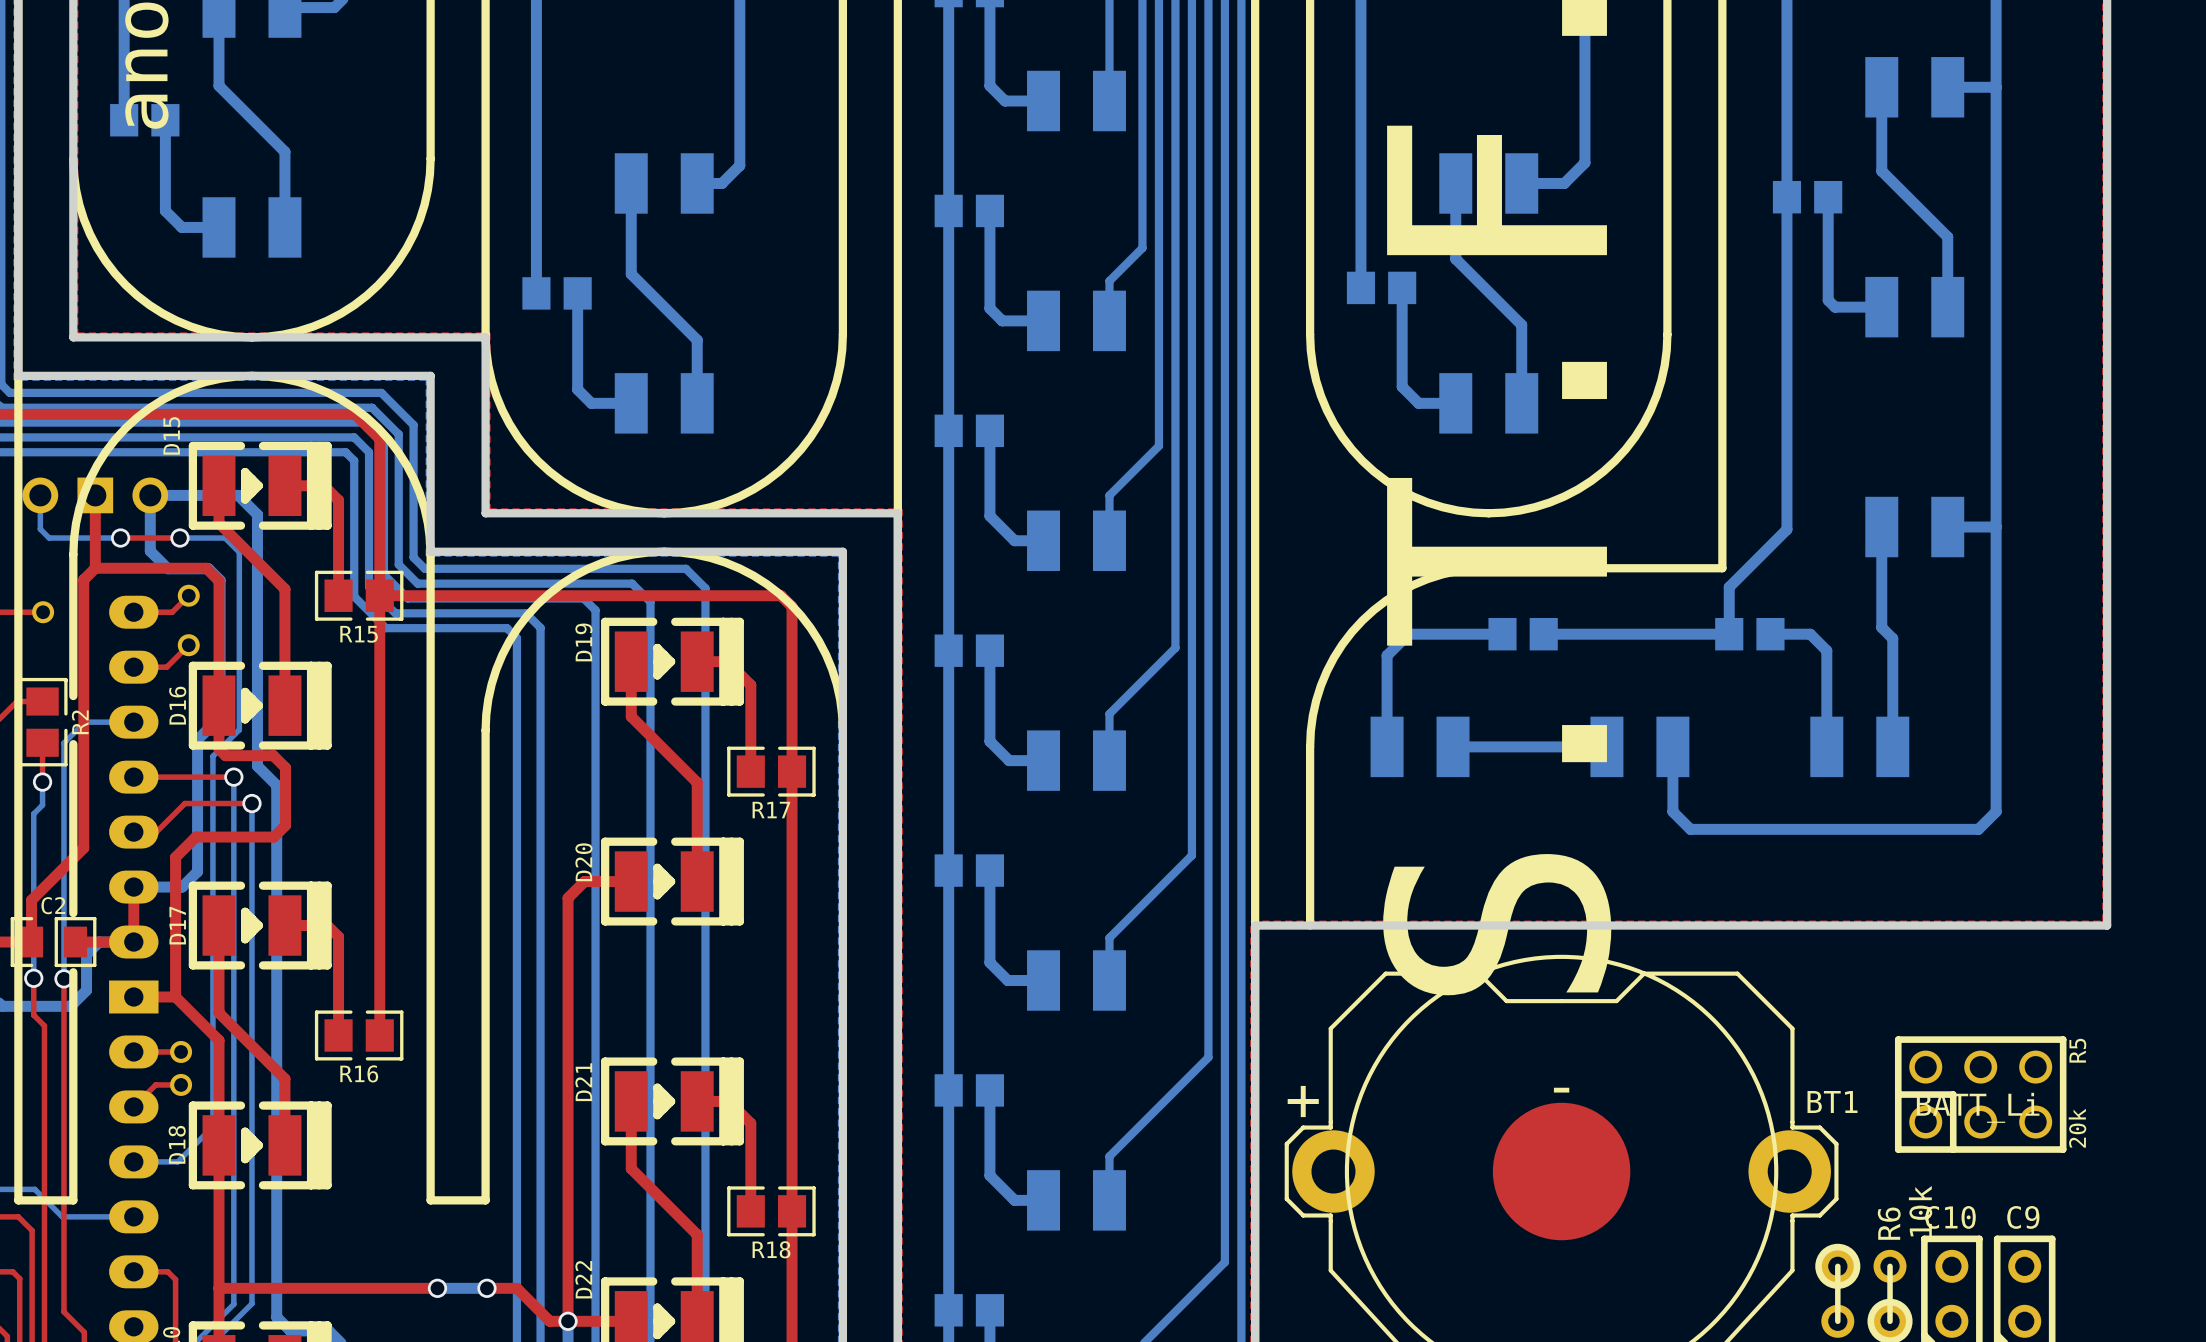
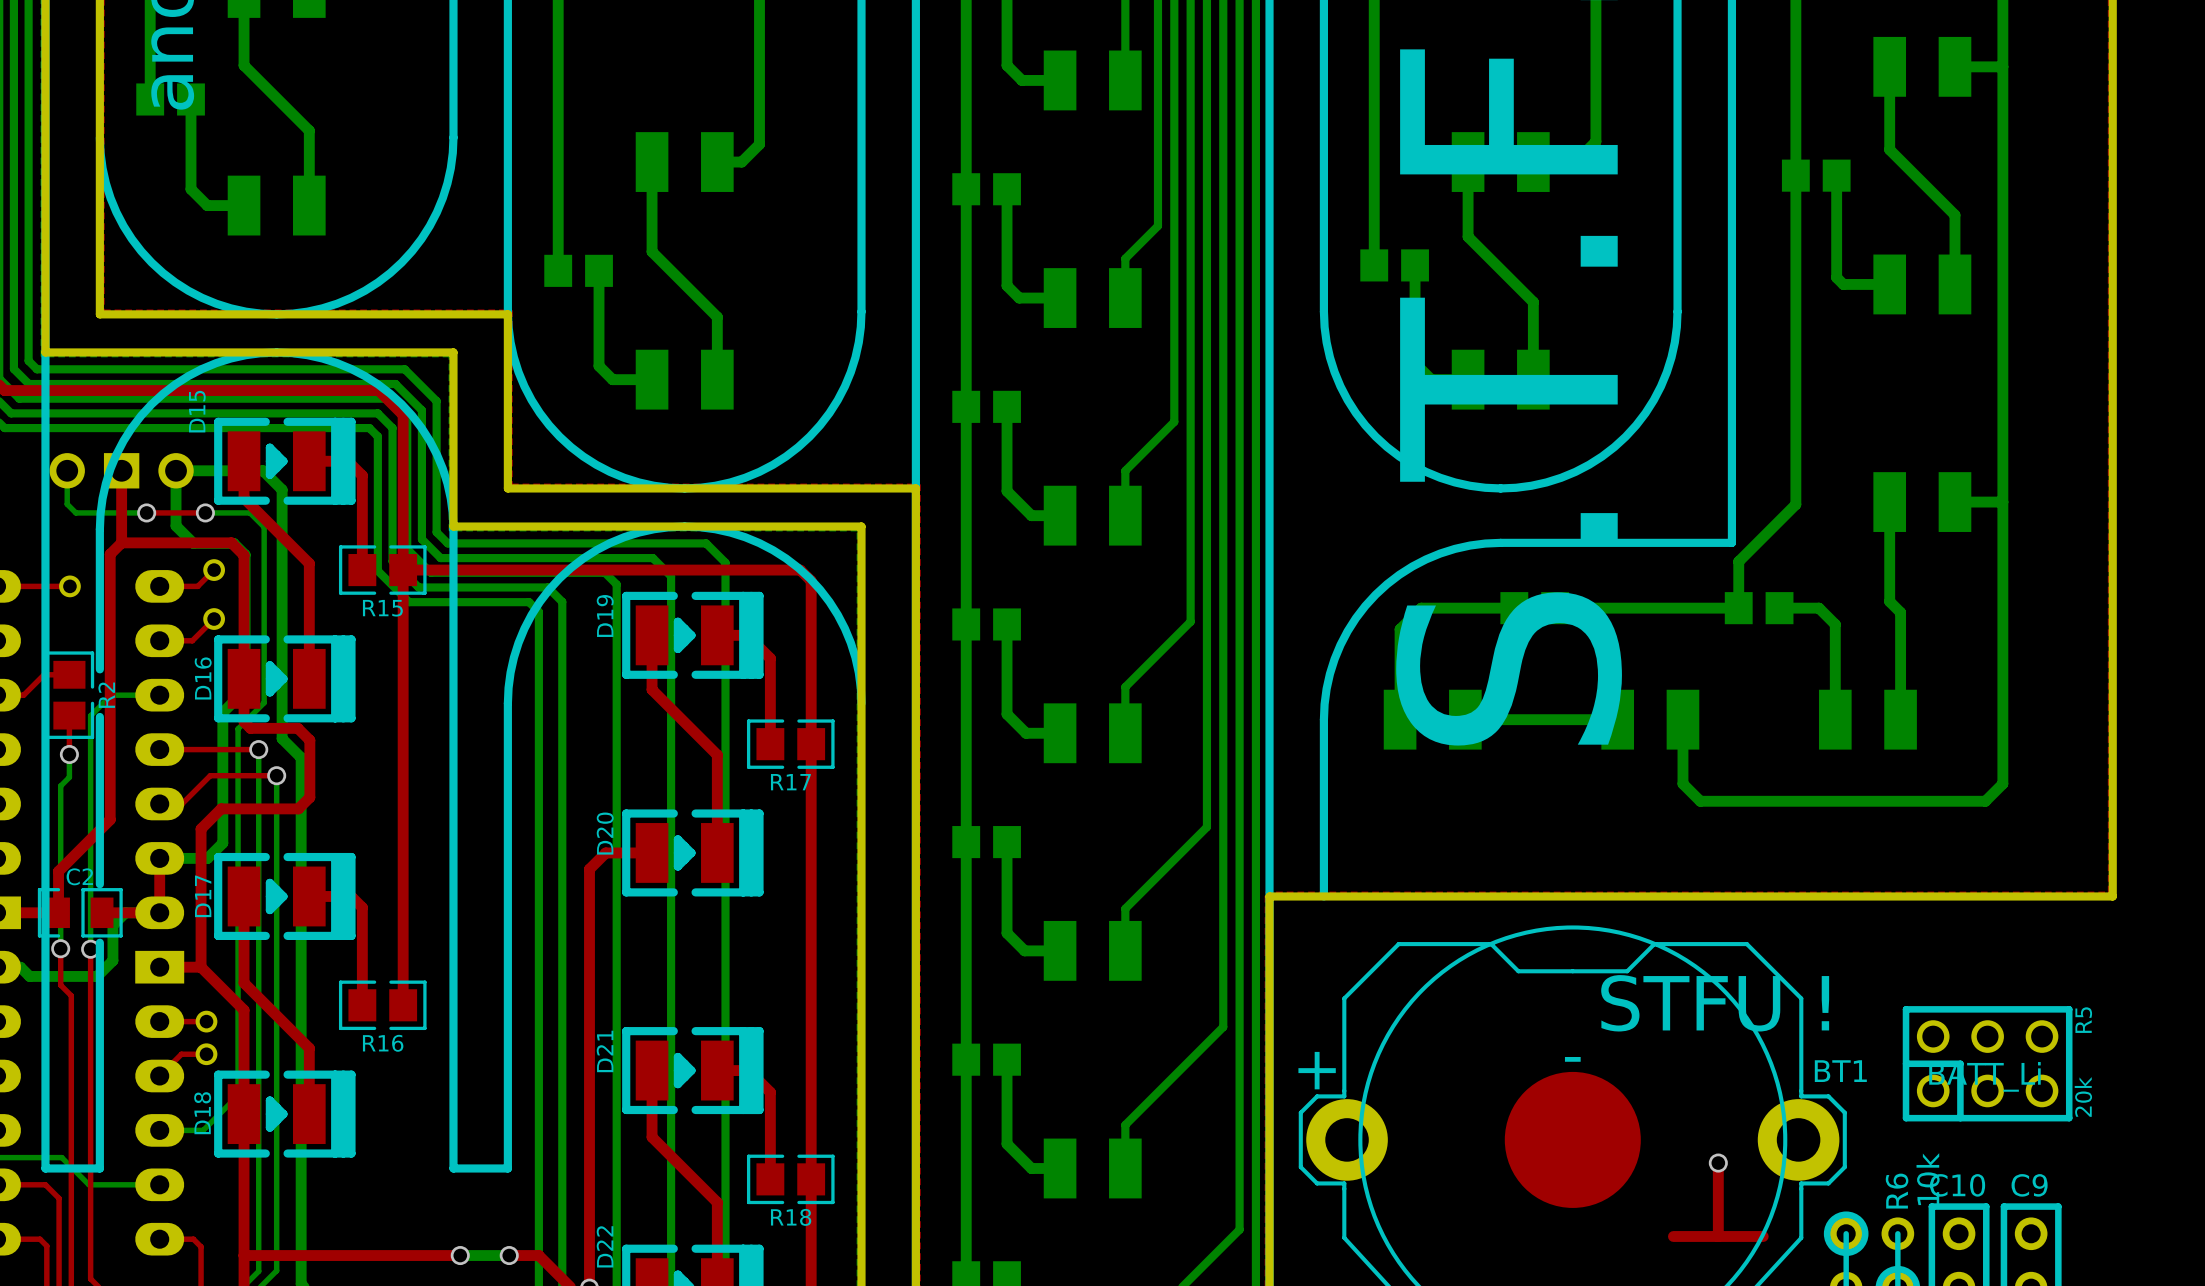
text: none -> STFU ! (1715, 1003)
top track: none -> (1718, 1163) (1718, 1236)
via: none -> (1718, 1163)
top track: none -> (1673, 1236) (1763, 1236)

